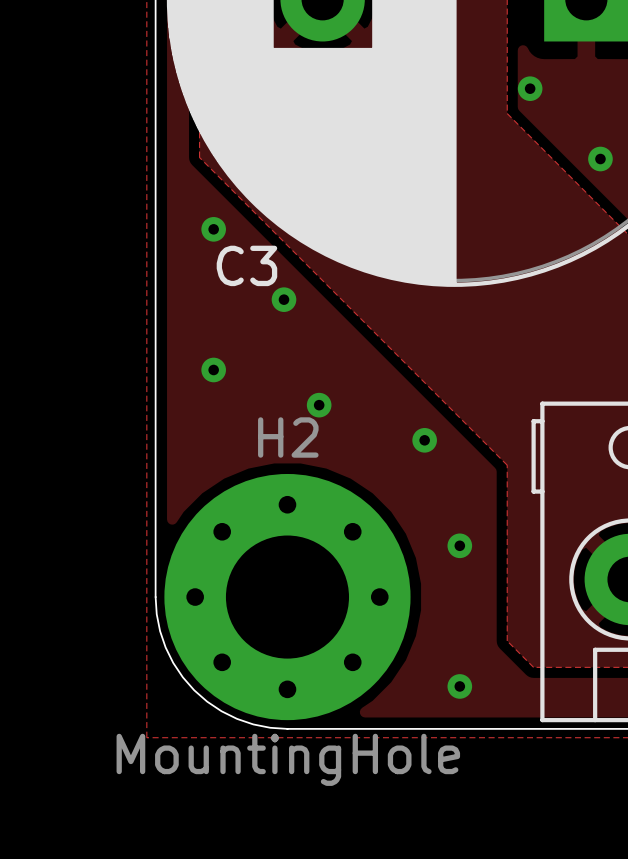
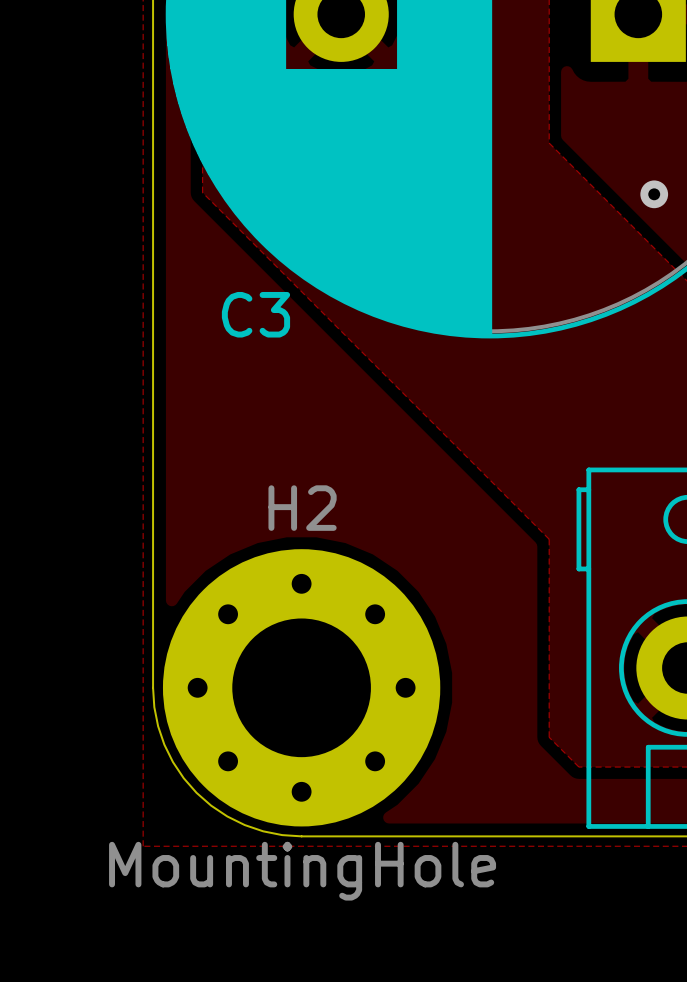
via: (530, 88) -> none
via: (213, 229) -> none
via: (284, 299) -> none
via: (213, 369) -> none
via: (319, 405) -> none
via: (424, 440) -> none
via: (459, 545) -> none
via: (459, 686) -> none

